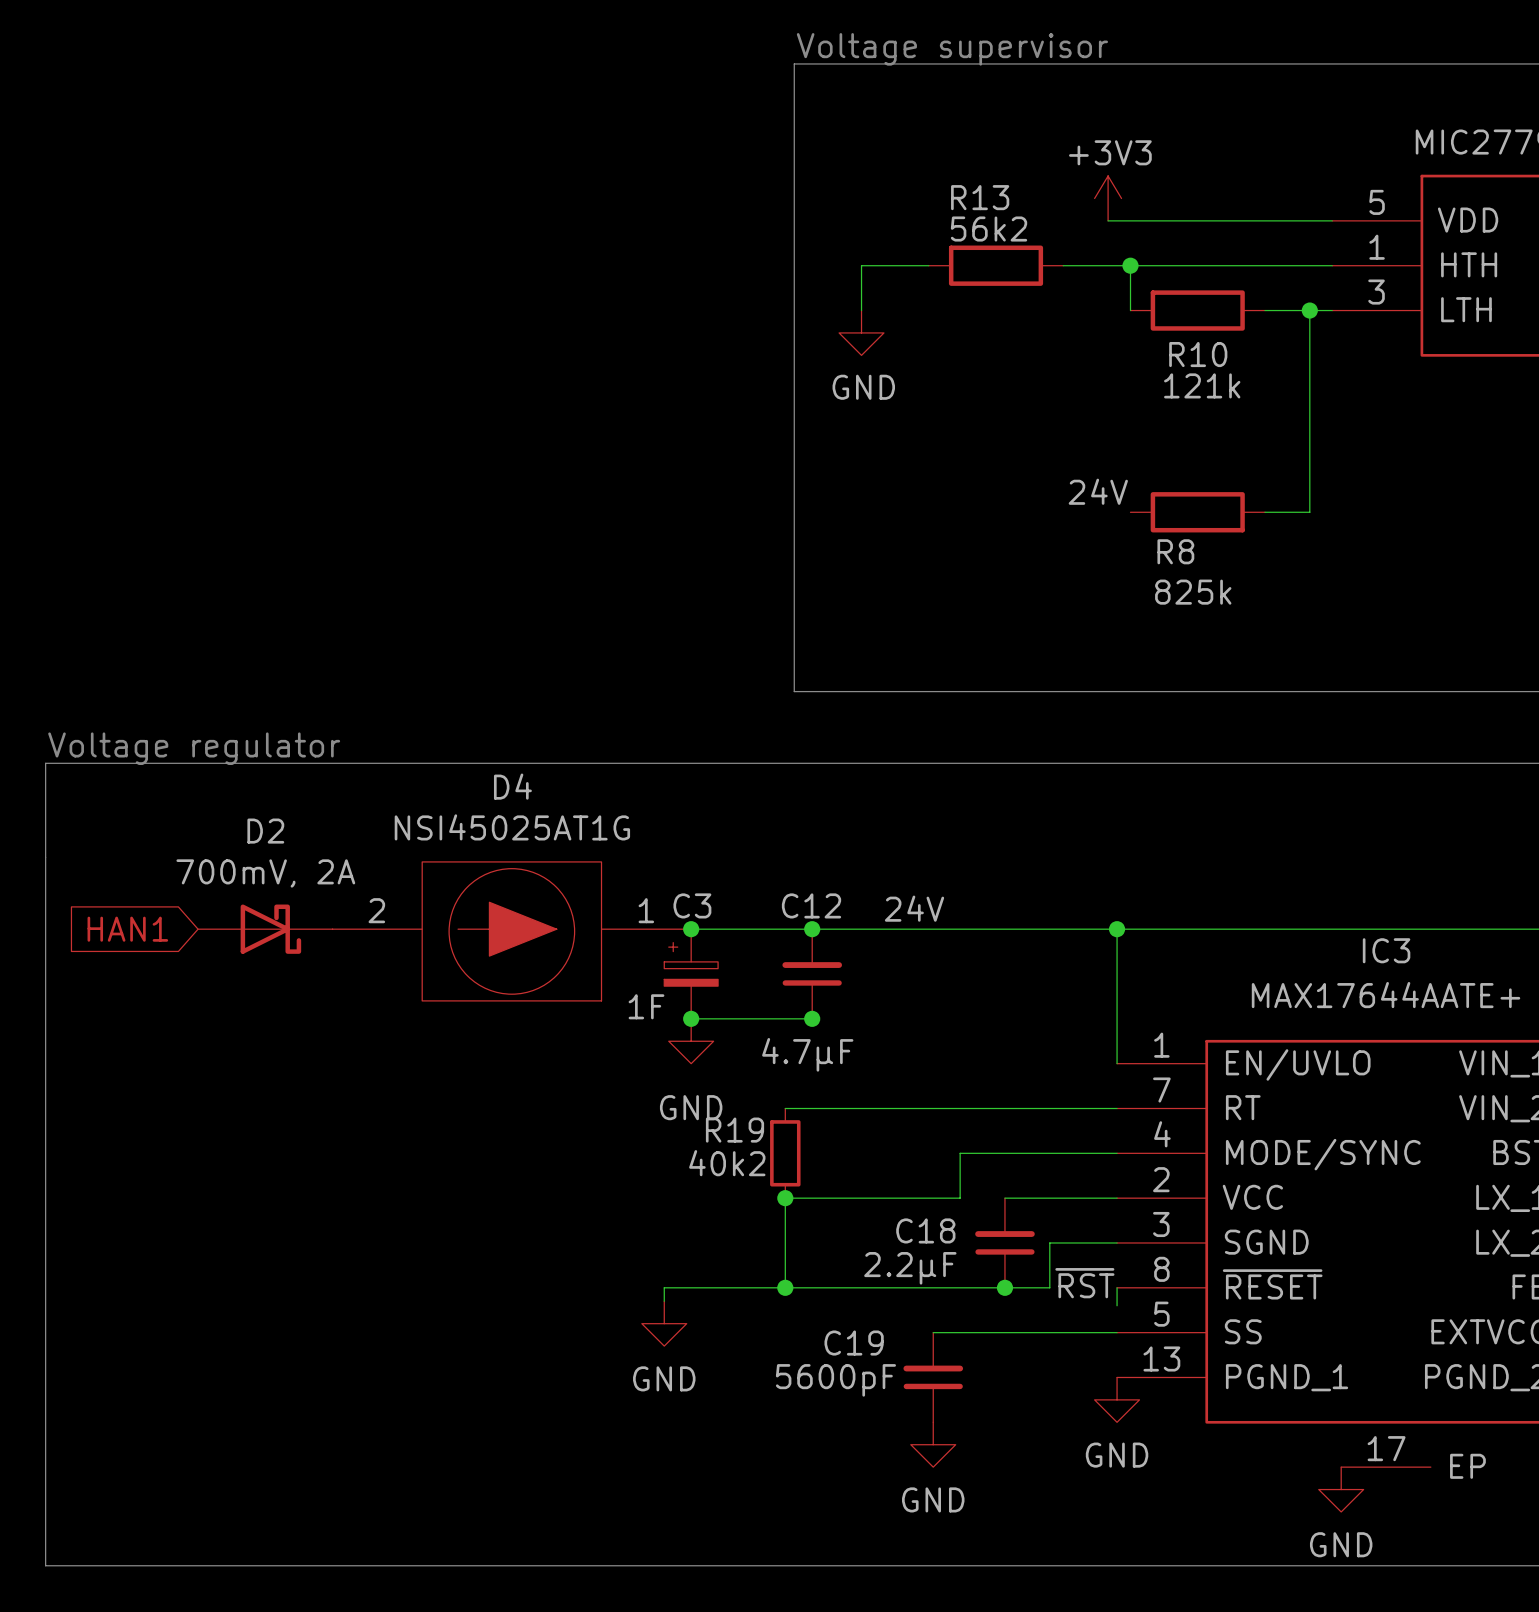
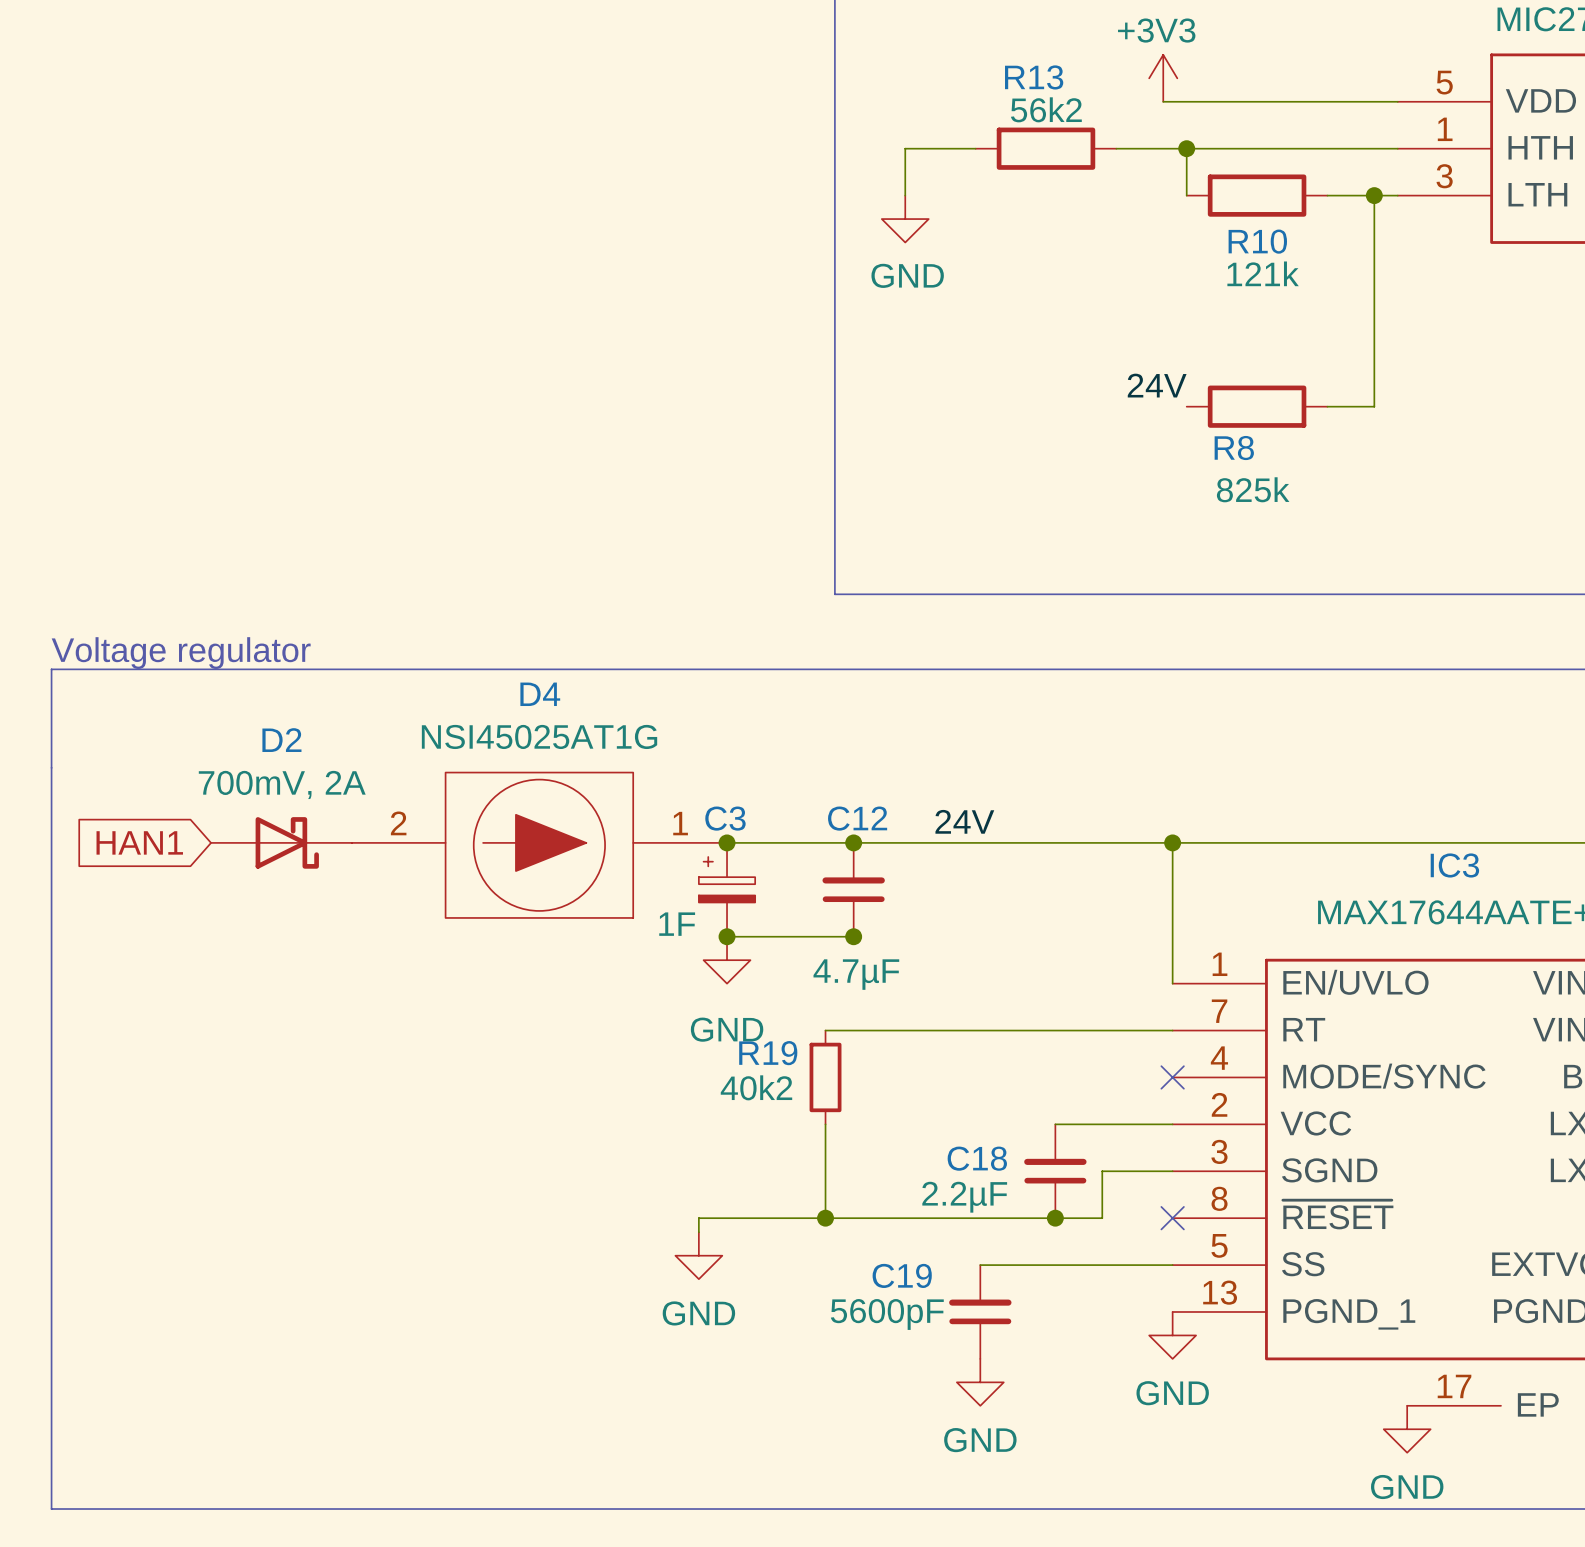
wire: (1117, 1153) (960, 1153) (960, 1198) (785, 1198) -> none
no-connect mark: none -> (1172, 1077)
junction: (785, 1198) -> none
label: ~{RST} (1084, 1283) -> none
wire: (1117, 1287) (1117, 1305) -> none
no-connect mark: none -> (1172, 1218)

